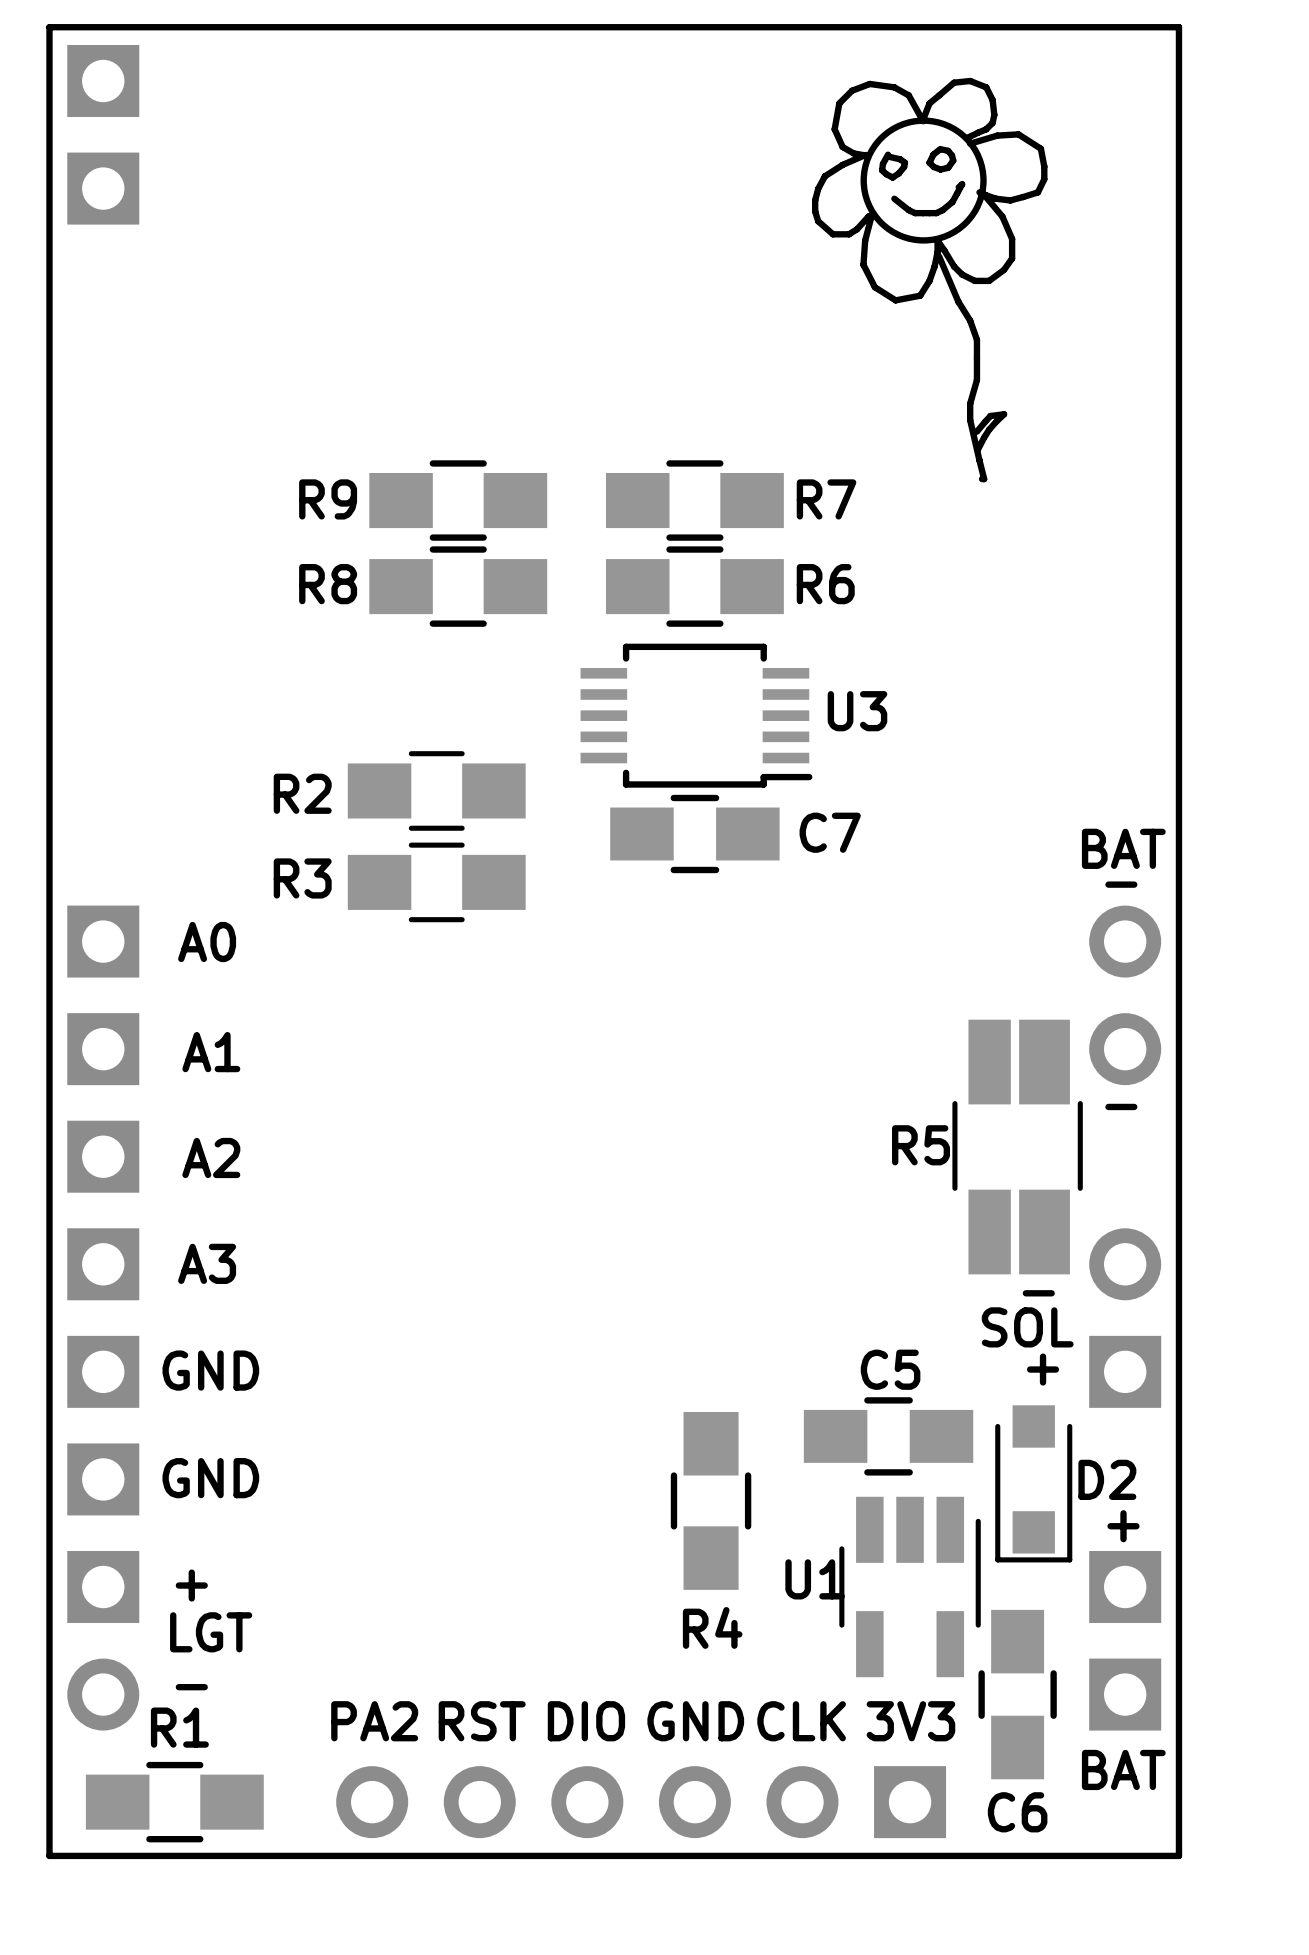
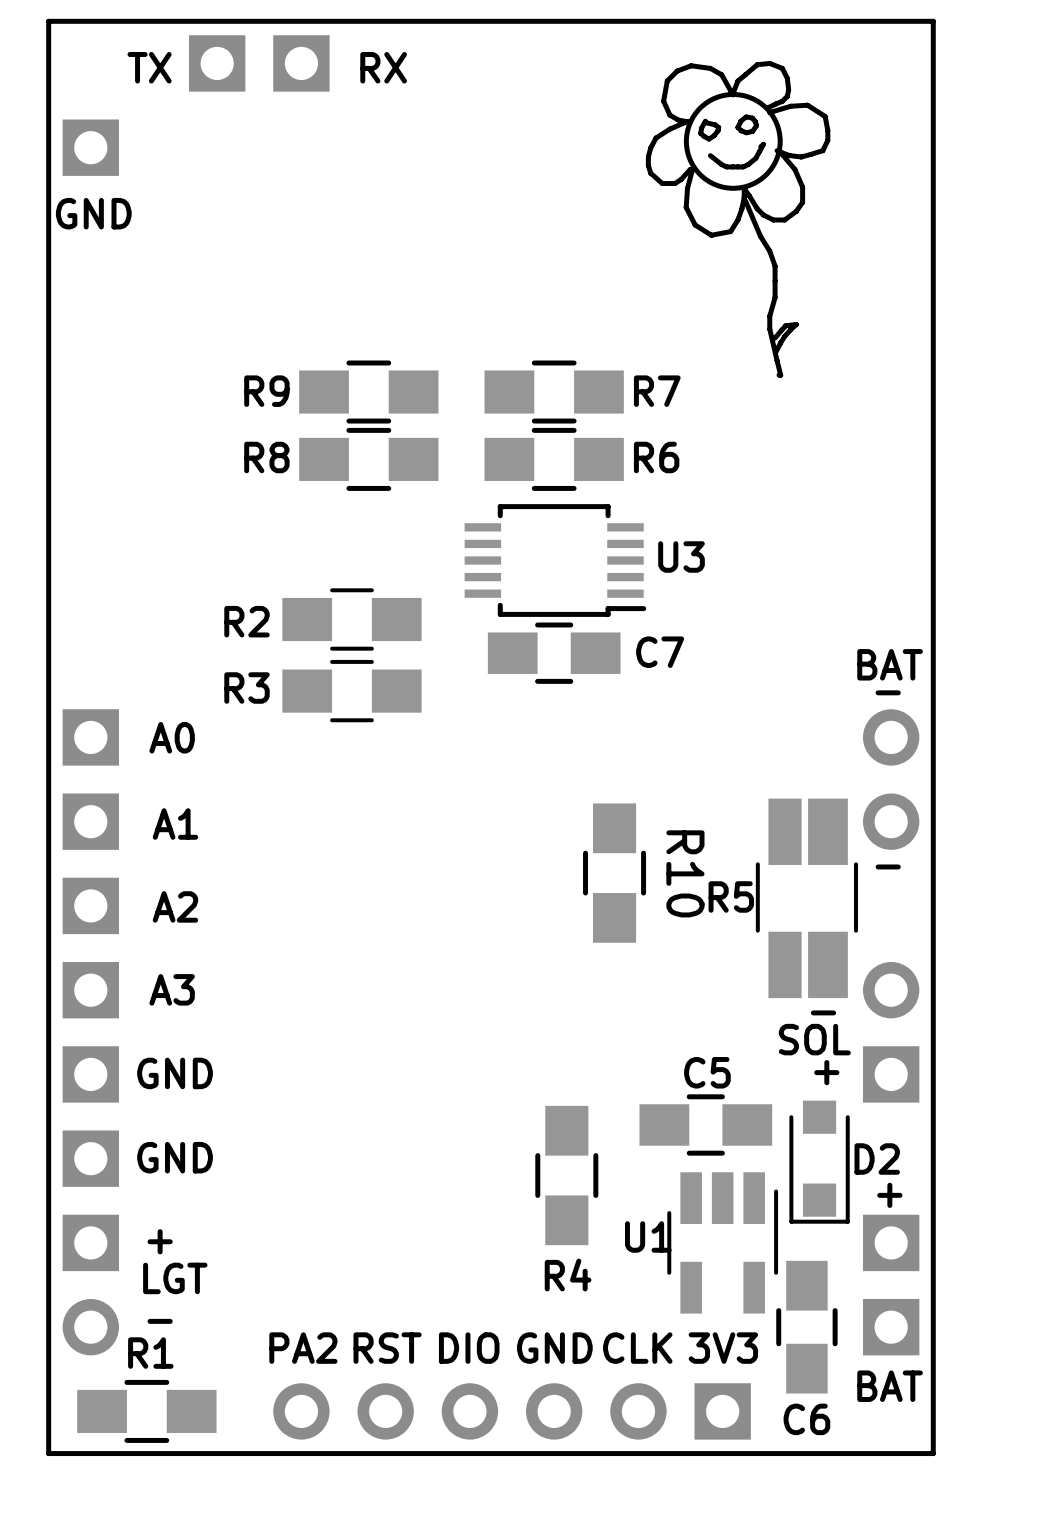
part: (103, 81) -> none
part: none -> (217, 63)
part: none -> (301, 63)
text: none -> TX (149, 67)
text: none -> RX (383, 67)
text: none -> GND (93, 213)
R10: none -> (614, 873)

